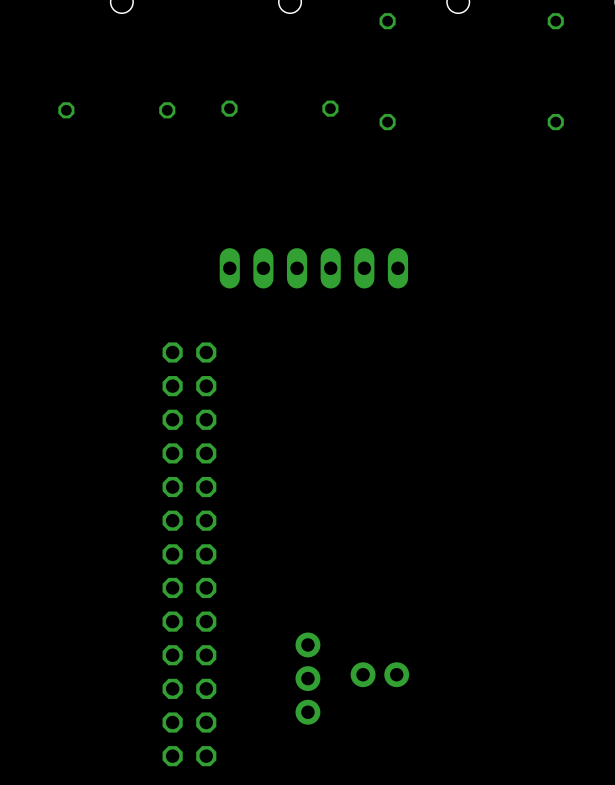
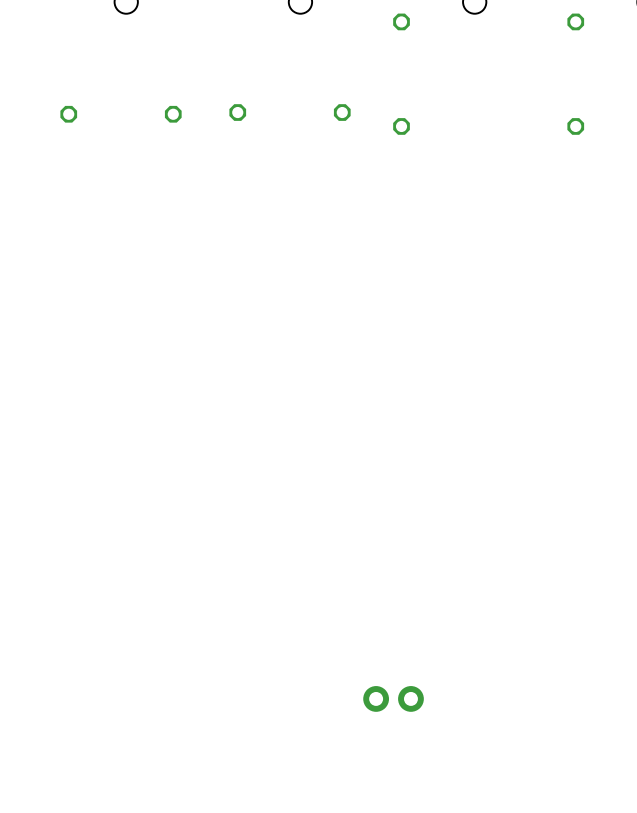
part: (313, 268) -> none
part: (189, 554) -> none
part: (307, 678) -> none

